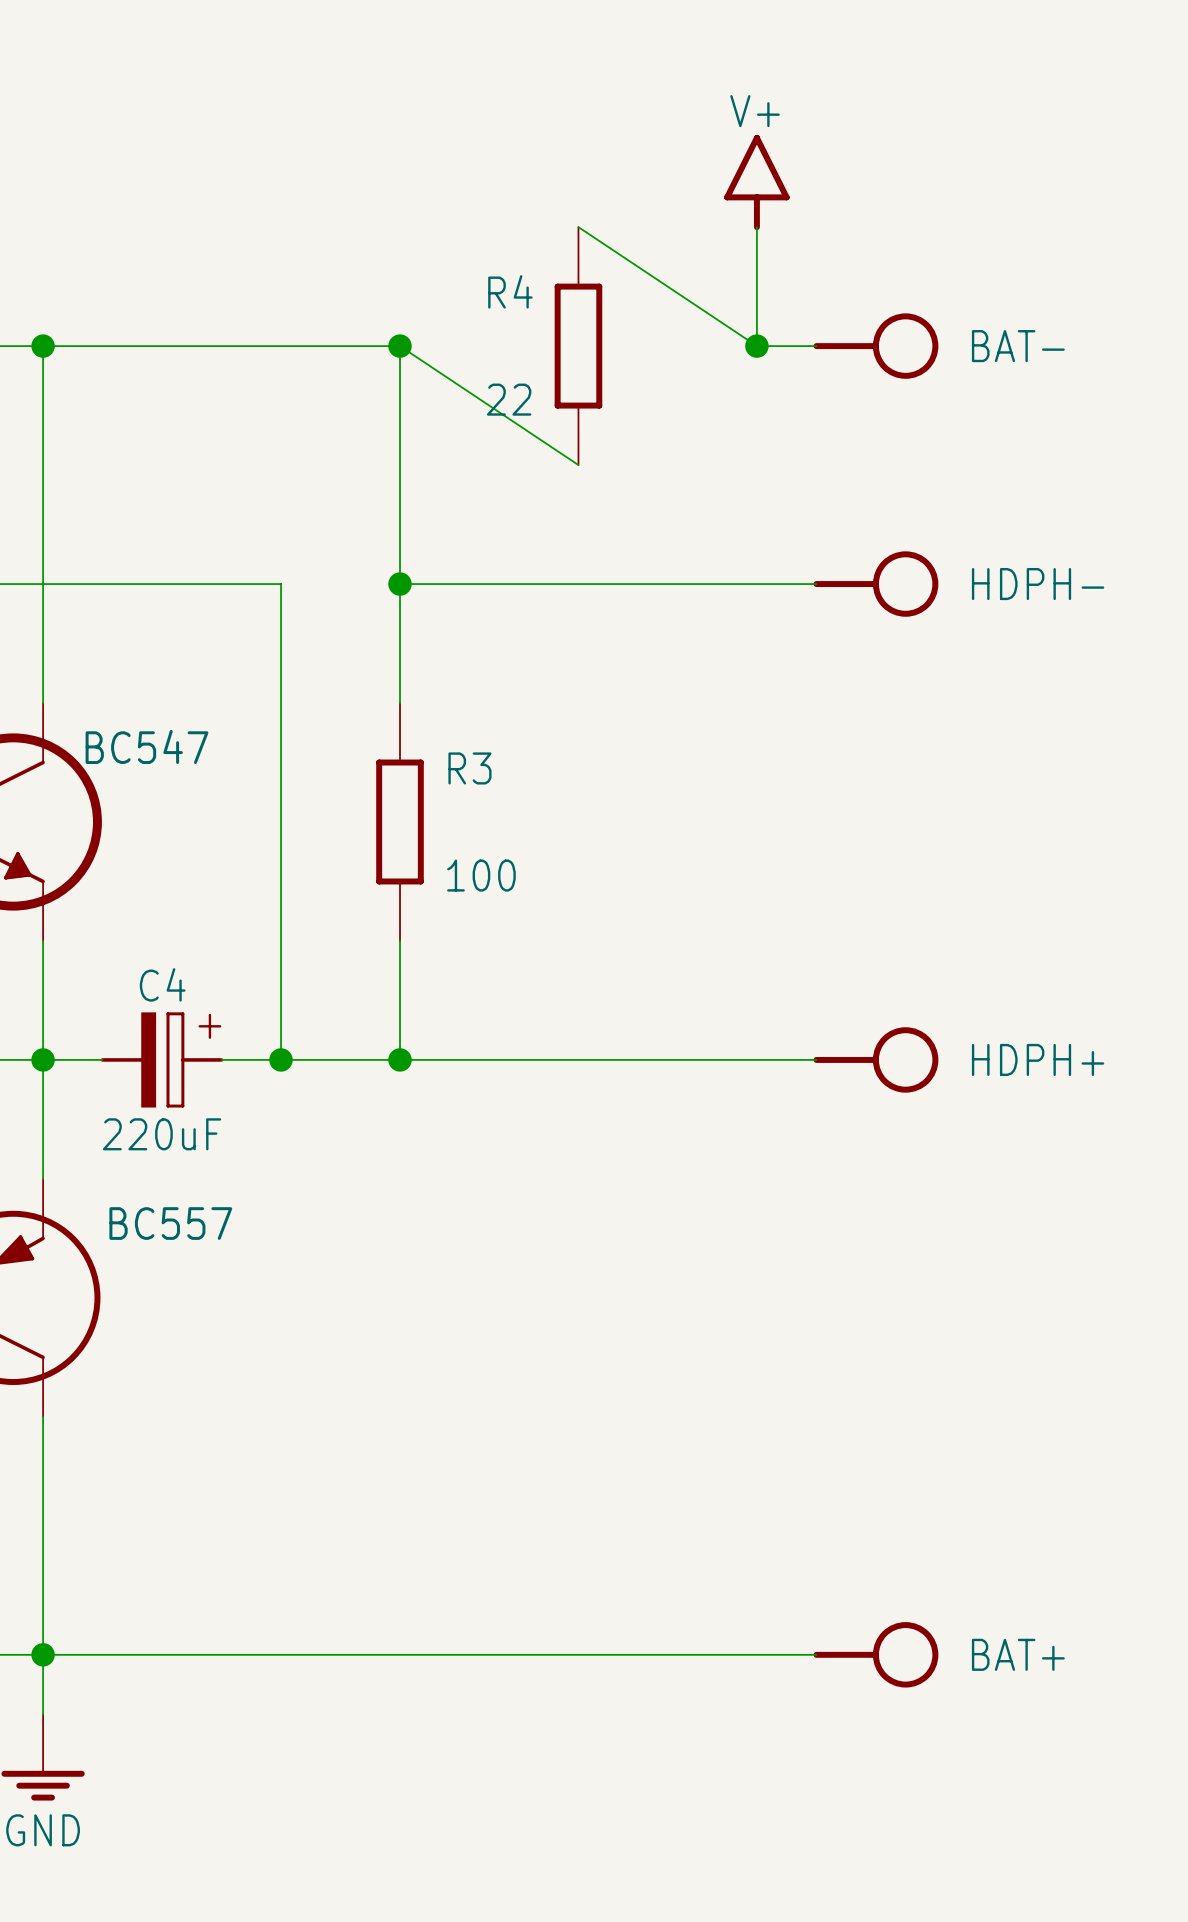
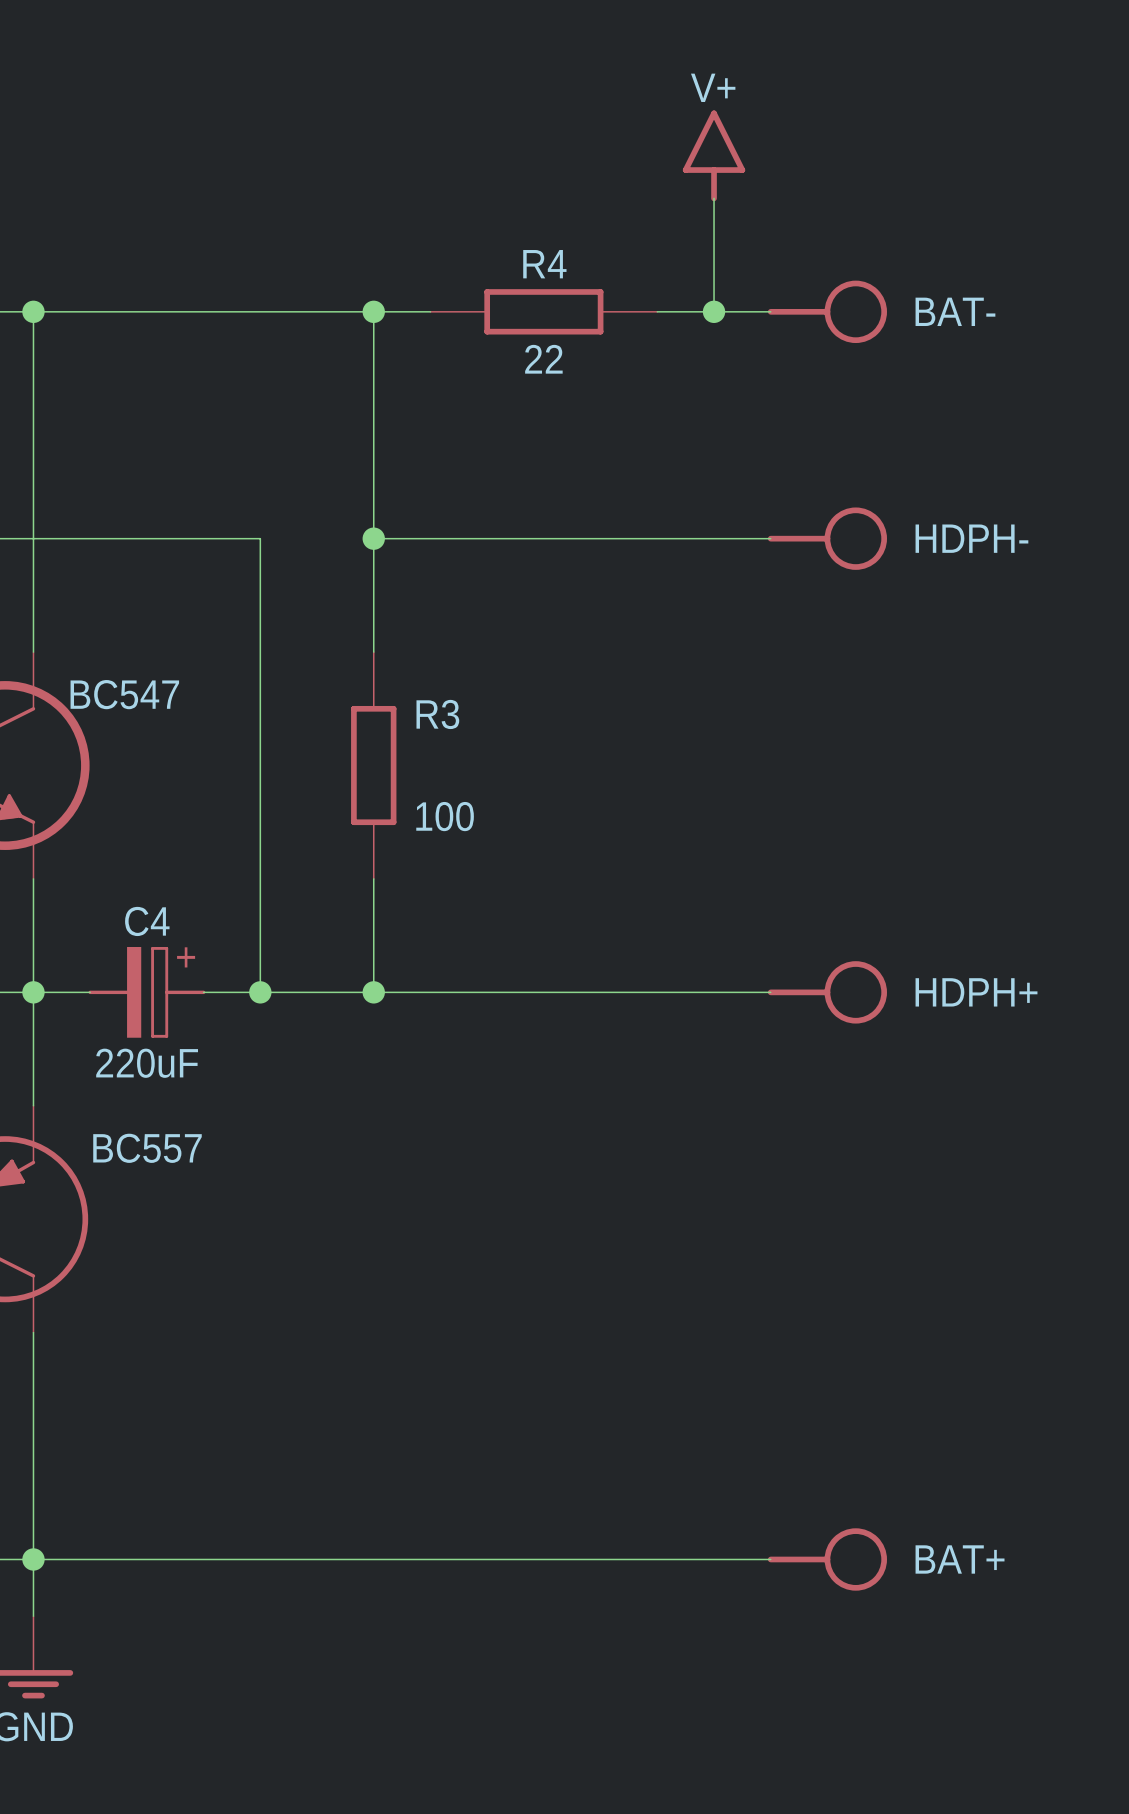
wire: (578, 227) (756, 346) -> (657, 311) (714, 311)
R4 name position: R4 (510, 291) -> R4 (544, 264)
wire: (400, 346) (578, 465) -> (373, 311) (430, 311)
R4 rotation: 0° (578, 346) -> 90° clockwise (543, 311)
R4 value position: 22 (509, 399) -> 22 (543, 359)

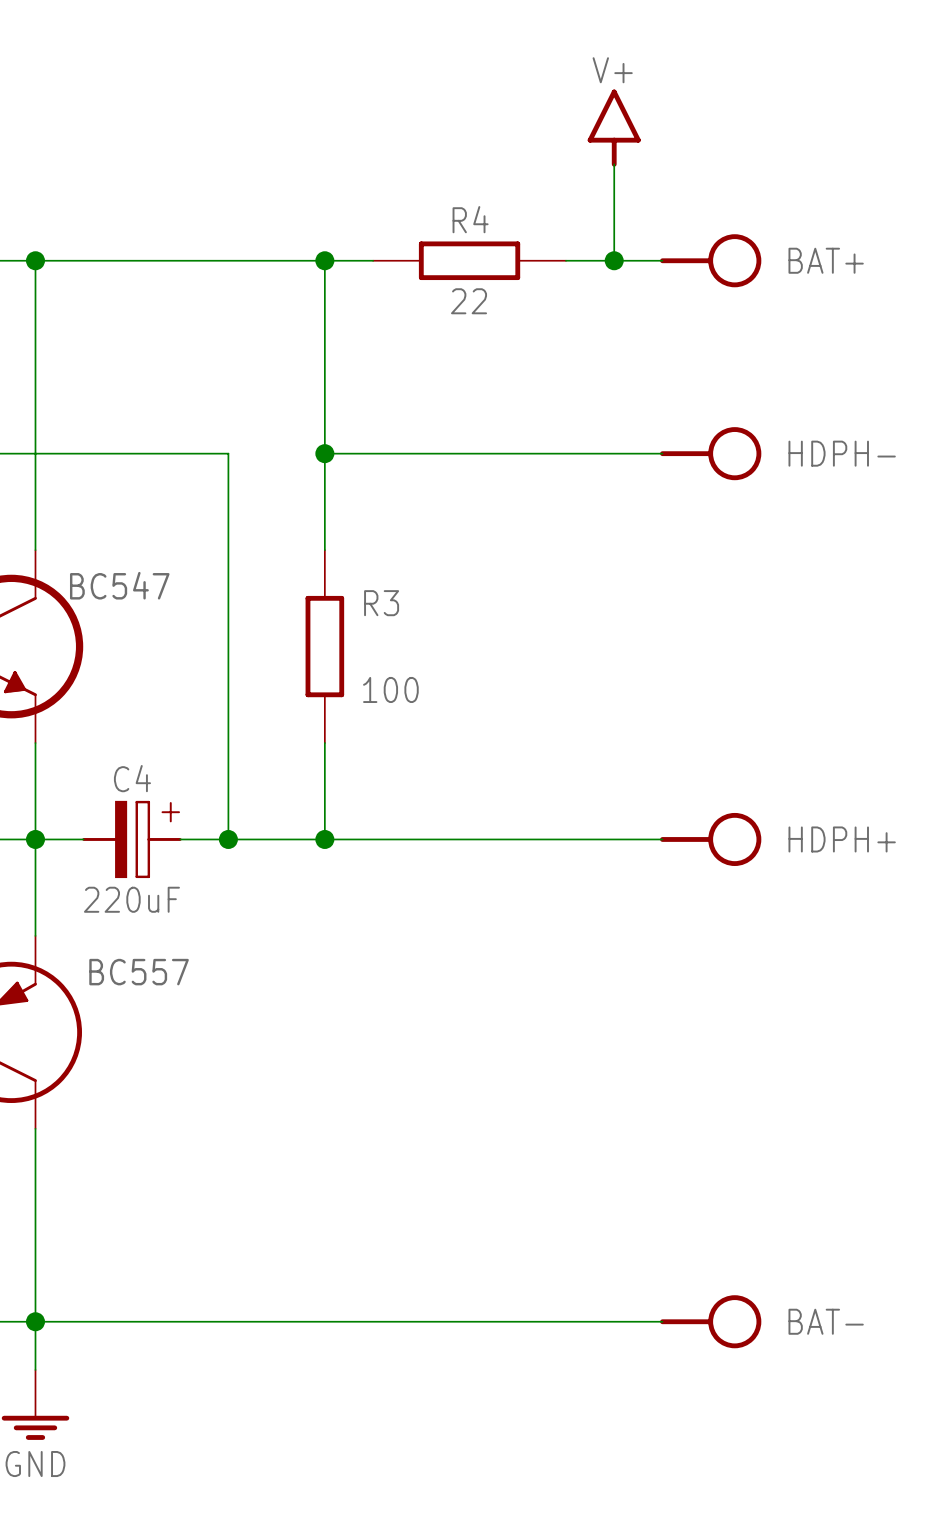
BAT- name: BAT- (955, 311) -> BAT+ (826, 260)
BAT+ name: BAT+ (960, 1559) -> BAT- (826, 1321)

